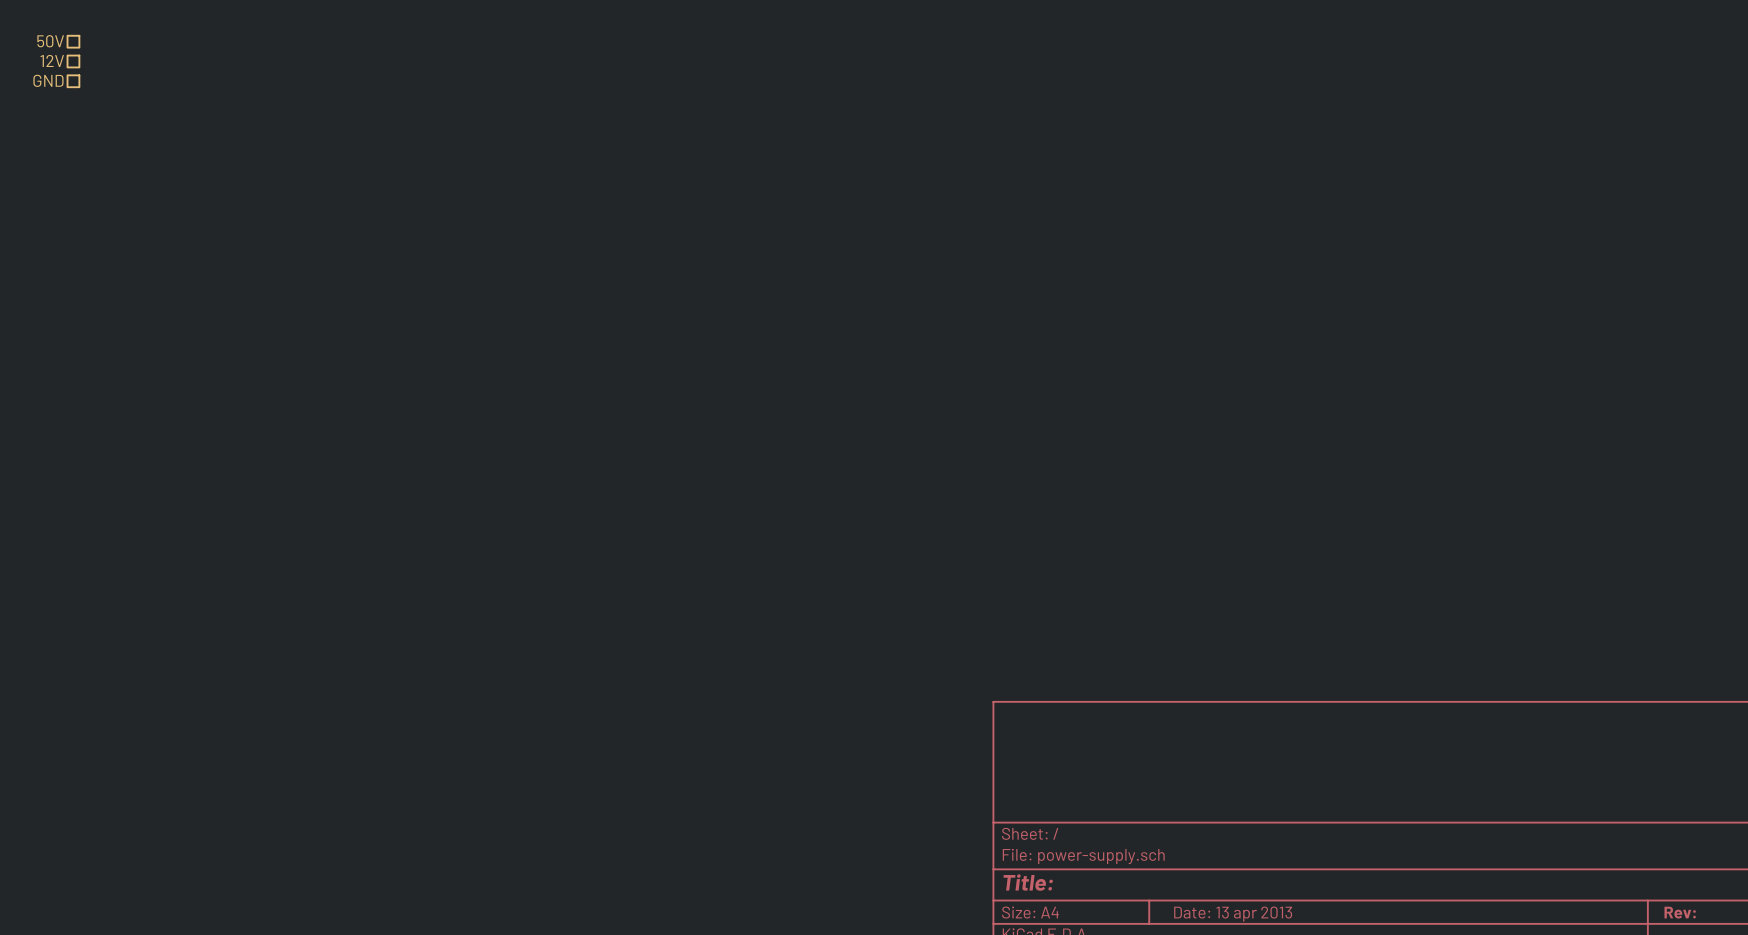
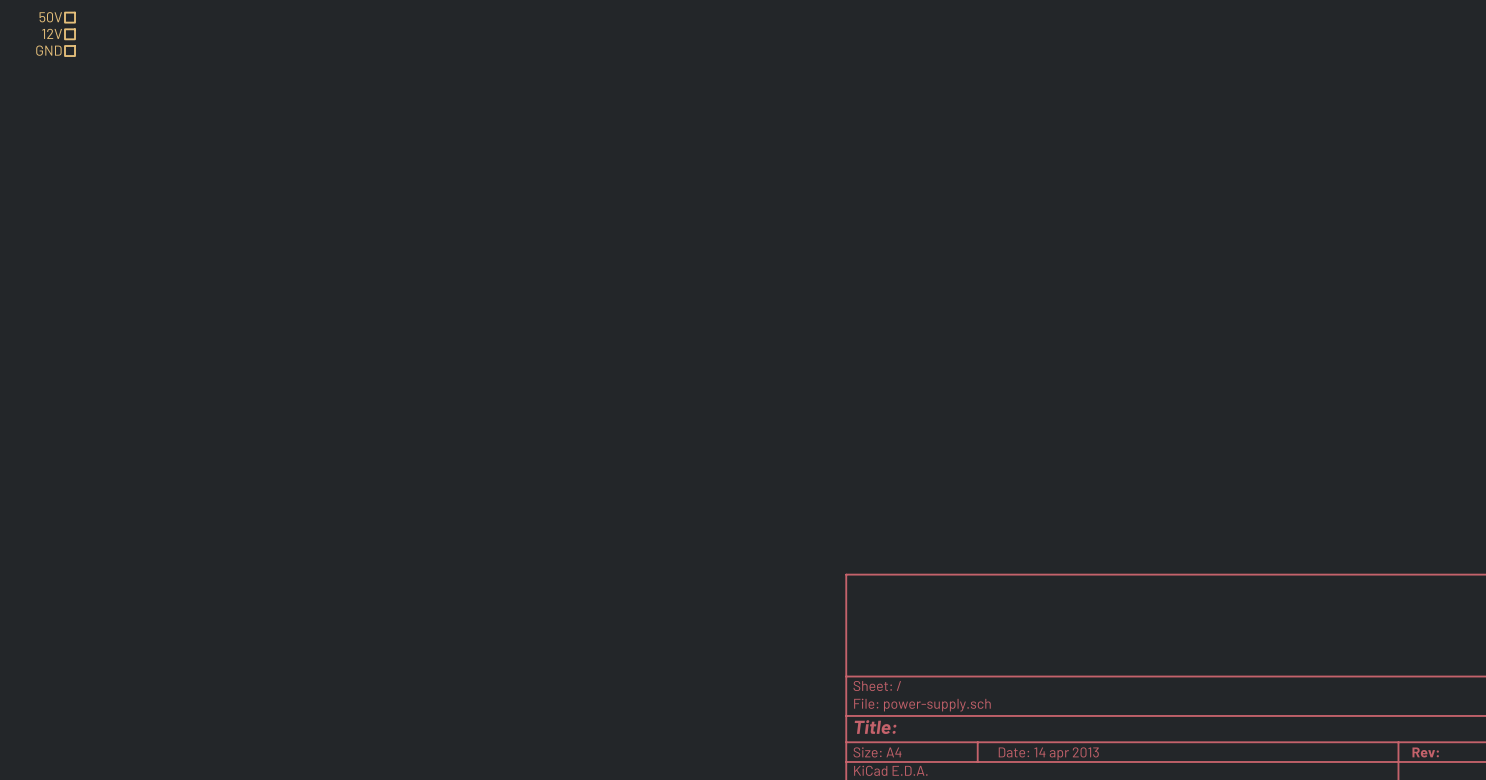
title block: Date: 13 apr 2013 (1233, 914) -> Date: 14 apr 2013 (1048, 753)

